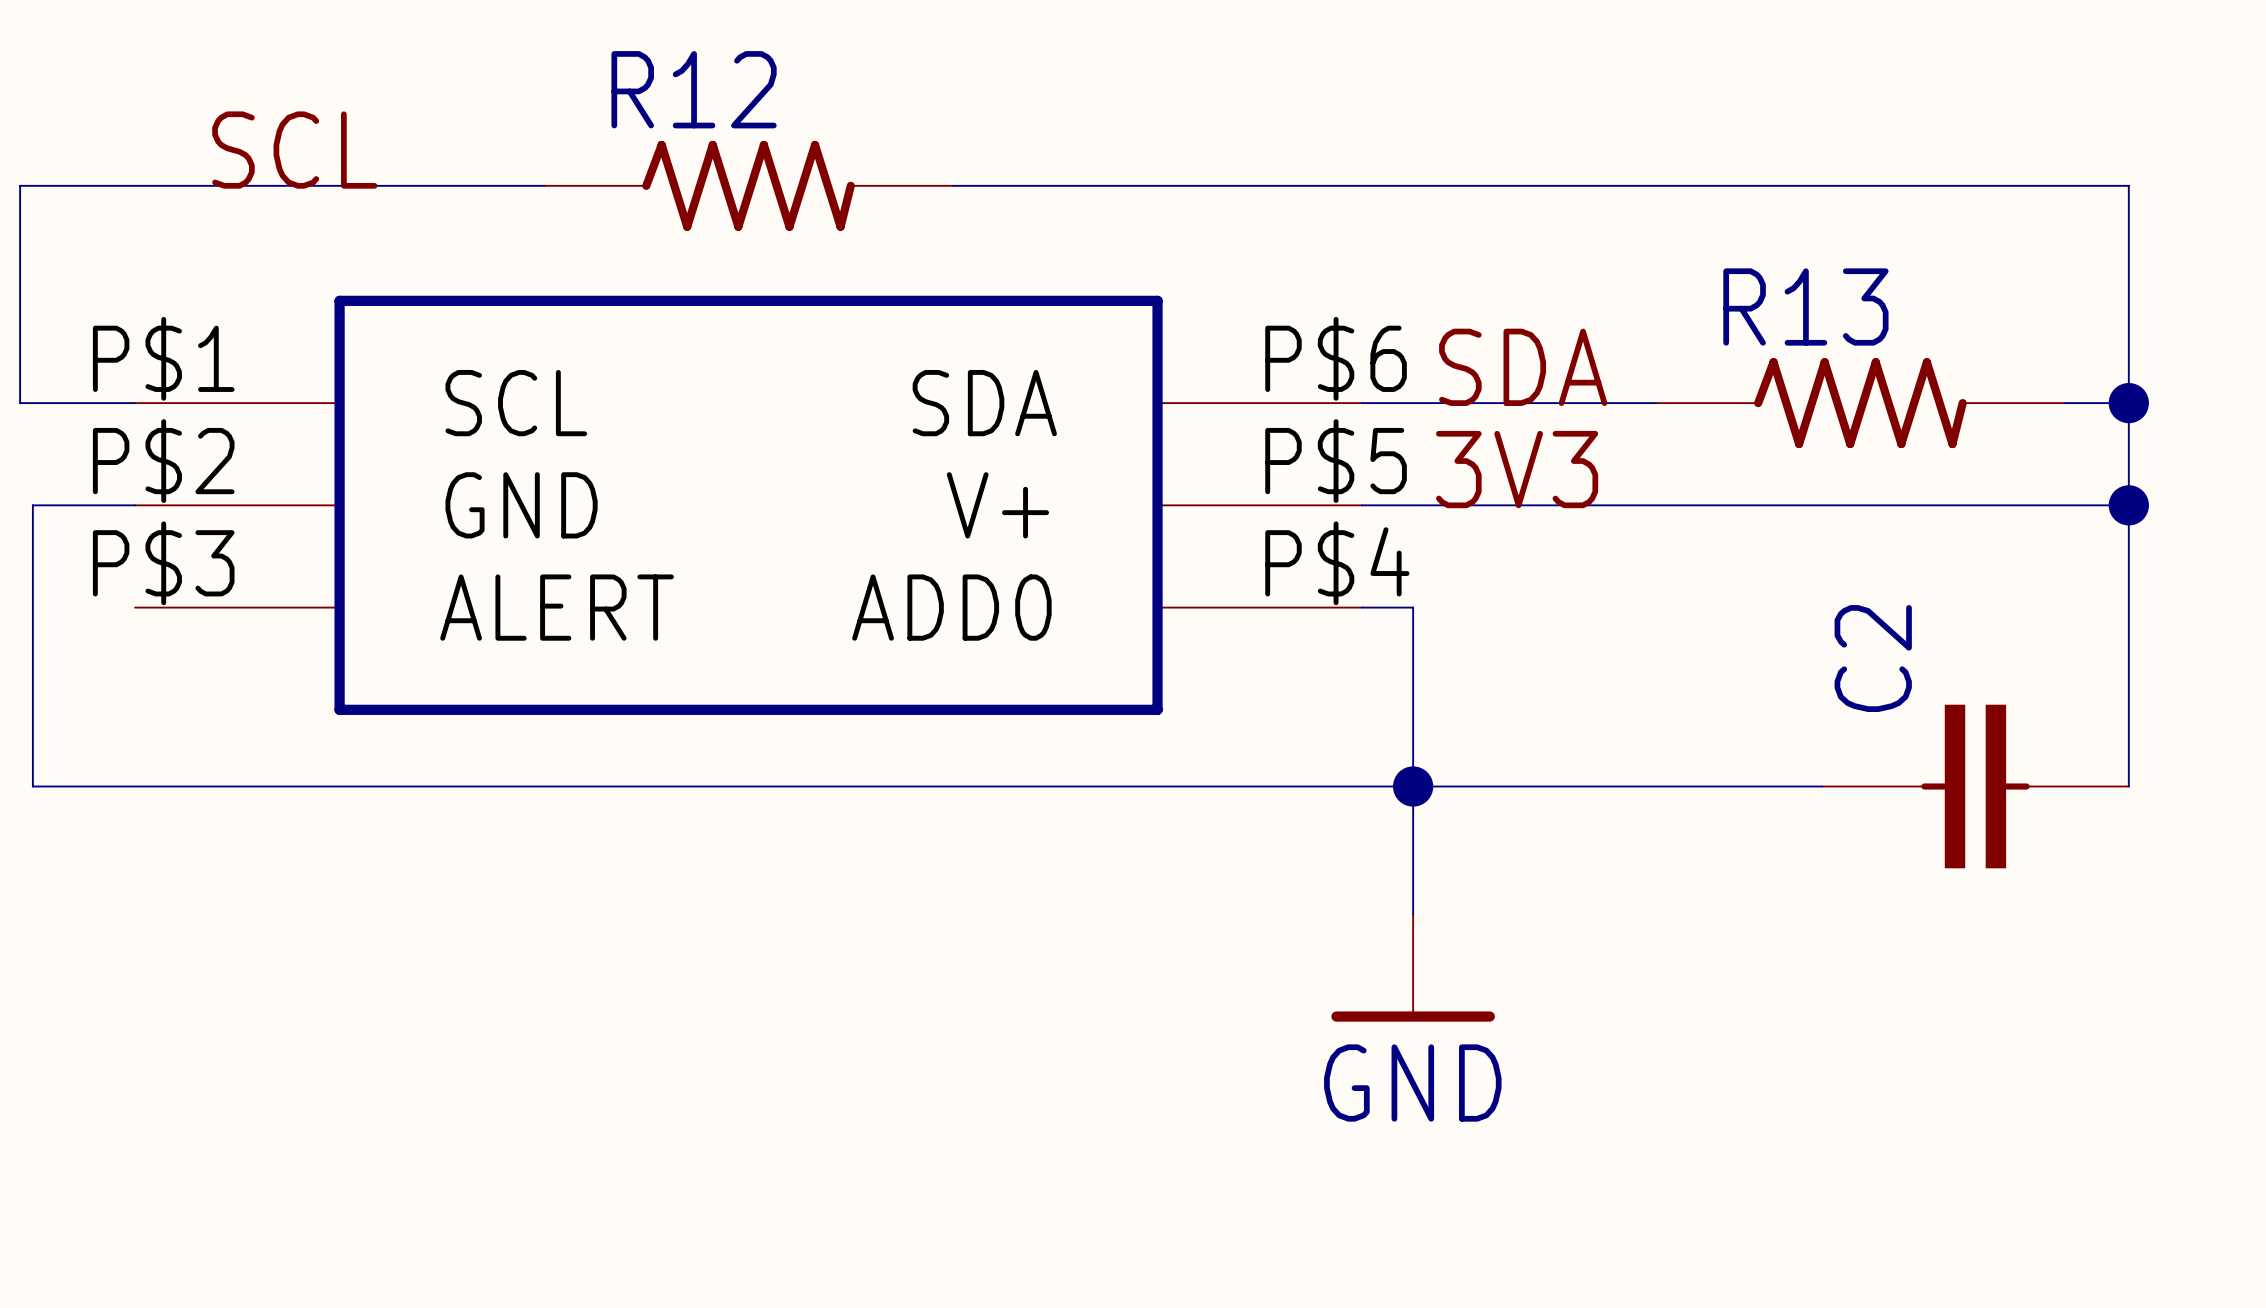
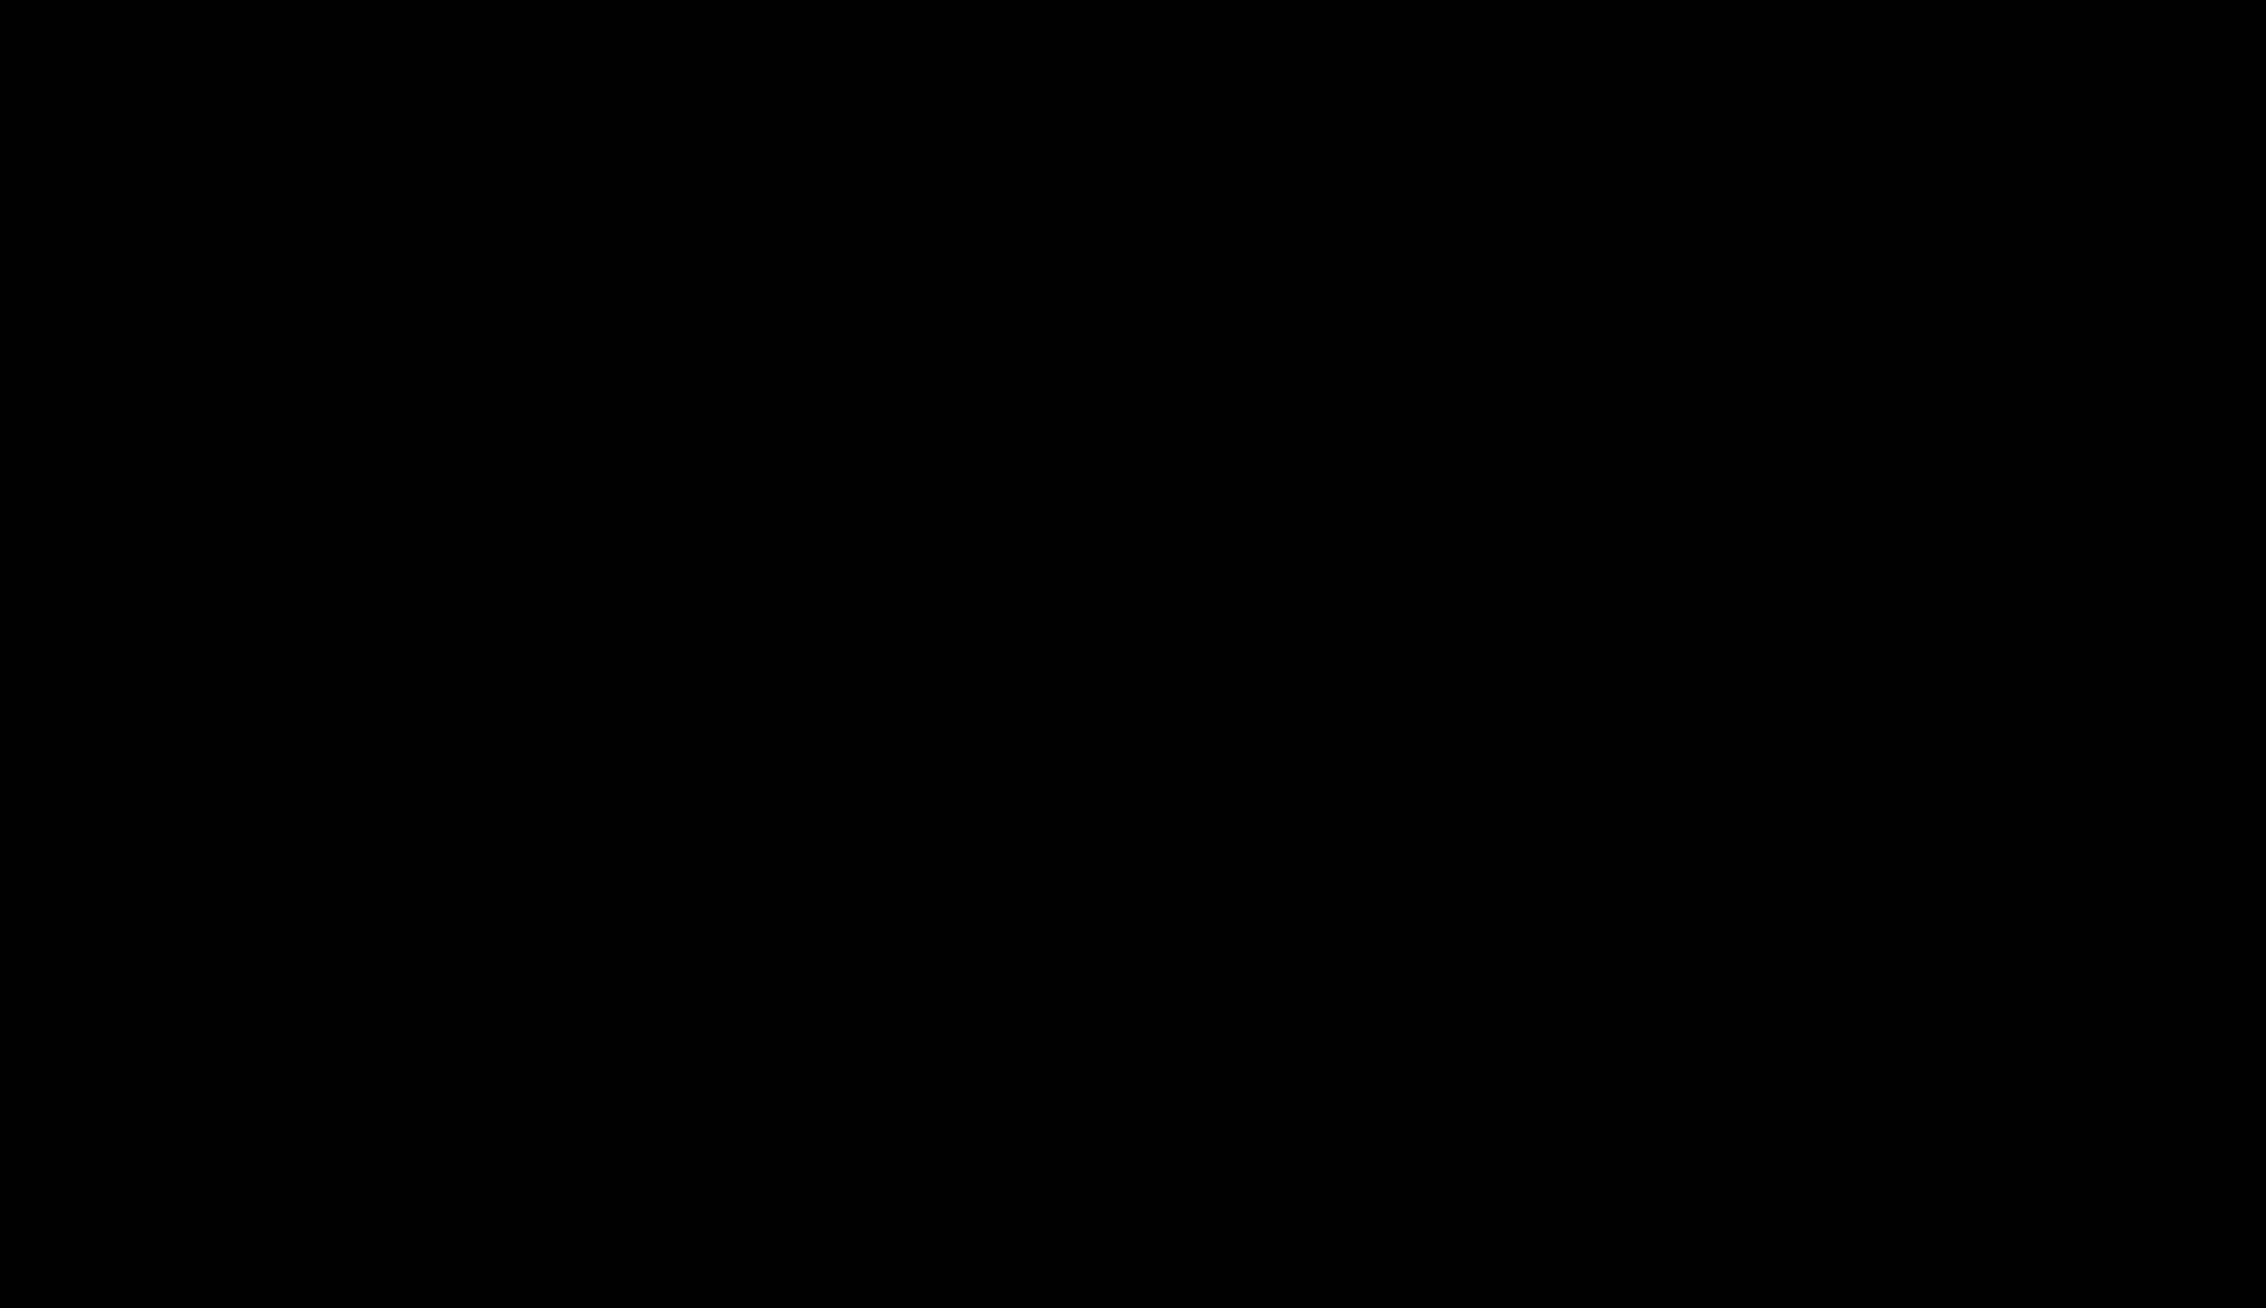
label: SCL (294, 150) -> none
wire: (544, 185) (20, 185) (20, 403) (135, 403) -> none
R12: (748, 185) -> none
wire: (953, 185) (2128, 185) (2128, 786) -> none
label: SDA (1523, 367) -> none
wire: (1362, 403) (1655, 403) -> none
R13: (1860, 403) -> none
wire: (2064, 403) (2128, 403) -> none
junction: (2128, 403) -> none
label: 3V3 (1517, 469) -> none
wire: (135, 505) (32, 505) (32, 786) (1822, 786) -> none
part: (748, 505) -> none
wire: (1362, 505) (2128, 505) -> none
junction: (2128, 505) -> none
wire: (1362, 607) (1413, 607) (1413, 914) -> none
junction: (1413, 786) -> none
C2: (1975, 786) -> none
power symbol: GND (1413, 967) -> none

